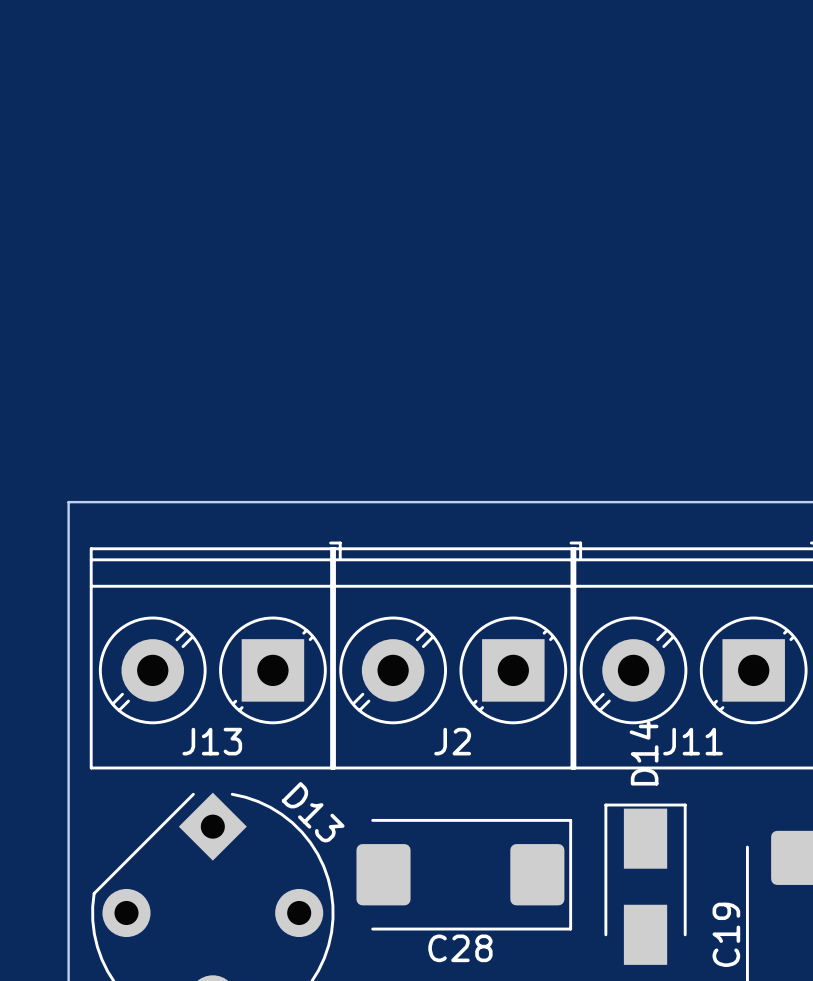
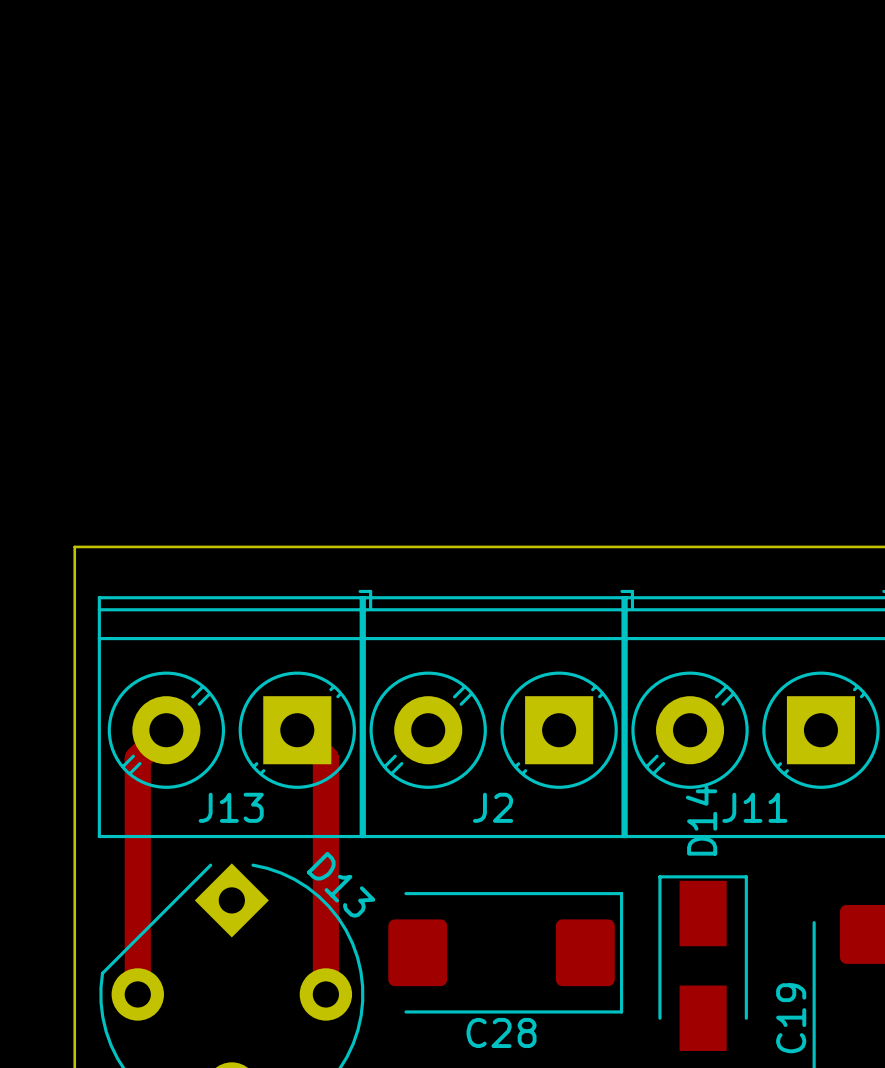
track: none -> (166, 730) (137, 758) (137, 994)
track: none -> (297, 730) (325, 758) (325, 994)

